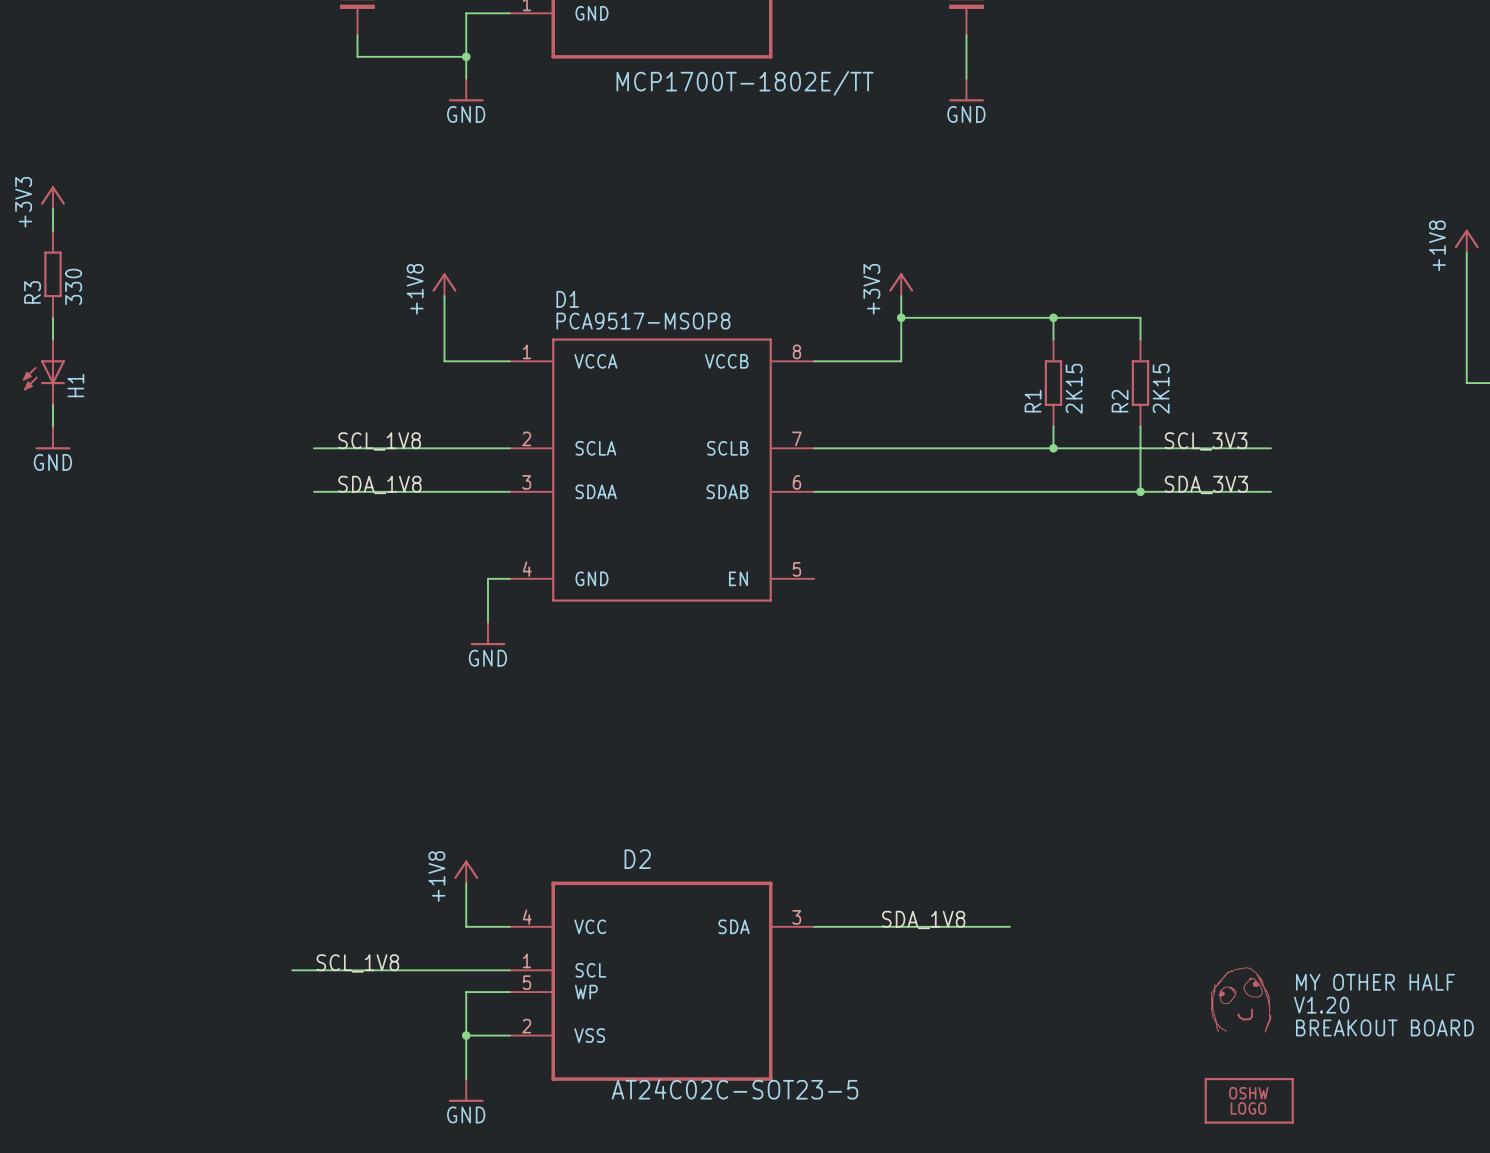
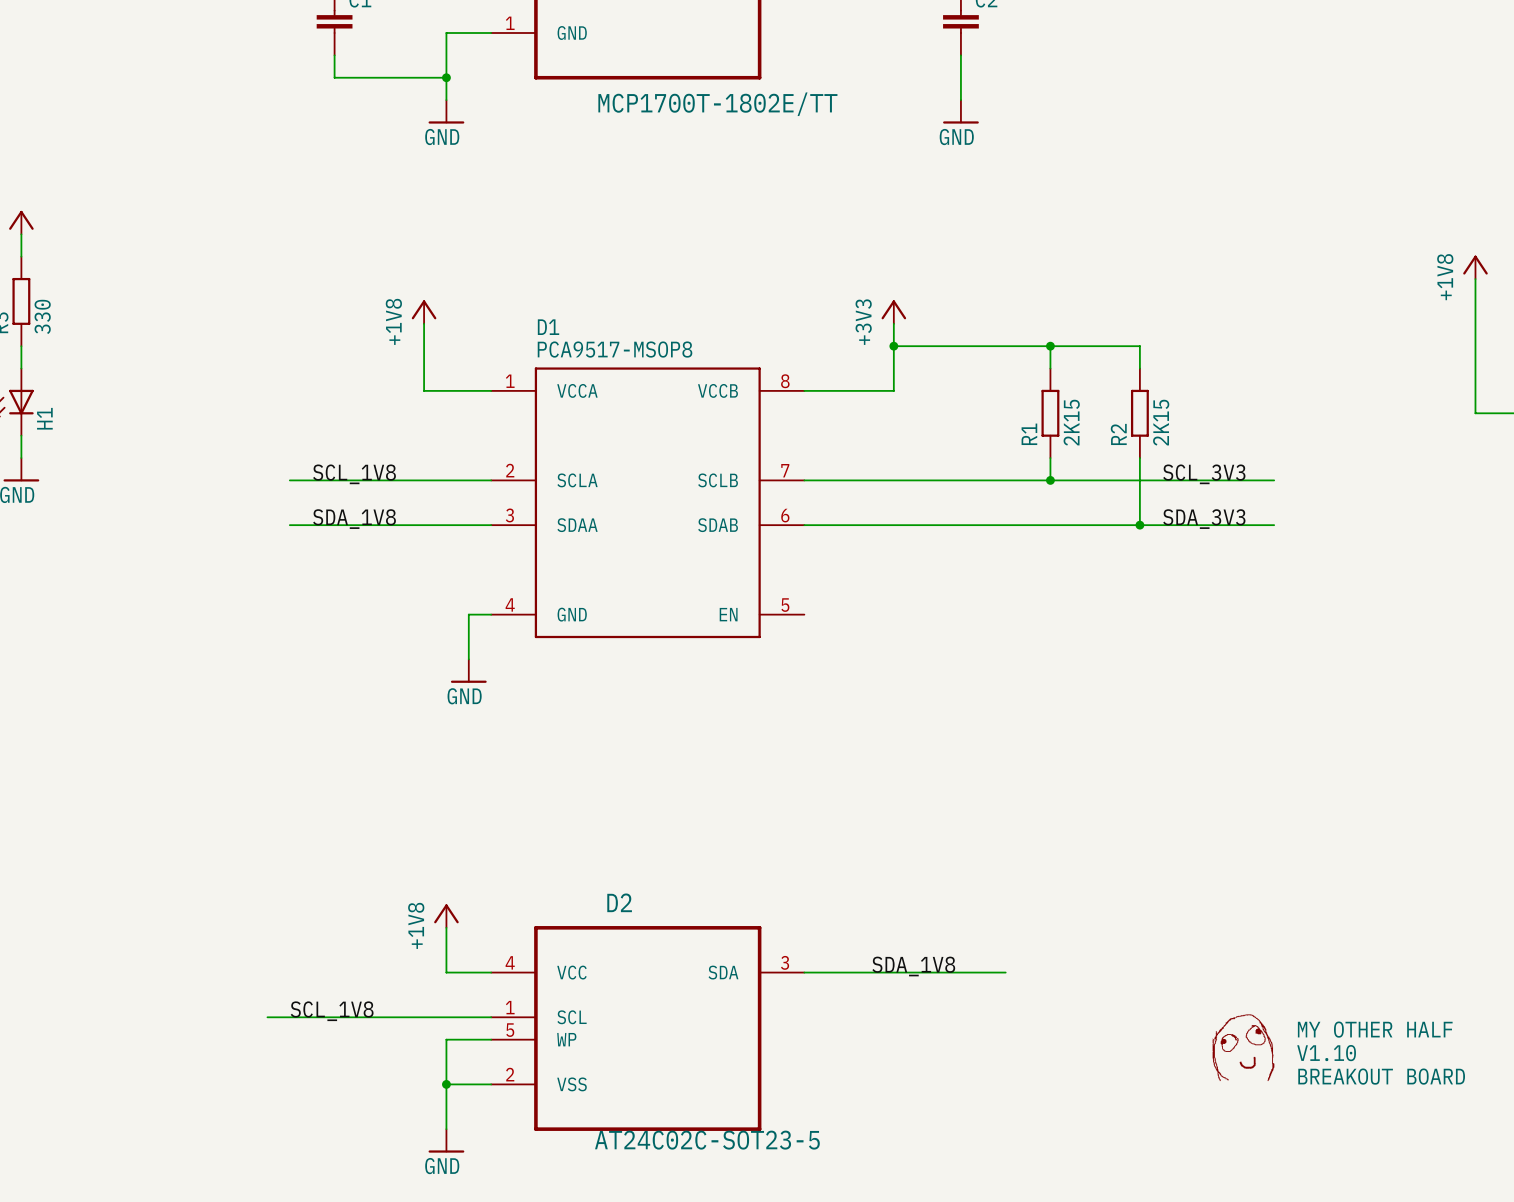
text: V1.20 (1321, 1005) -> V1.10 (1326, 1053)
part: (1249, 1100) -> none

